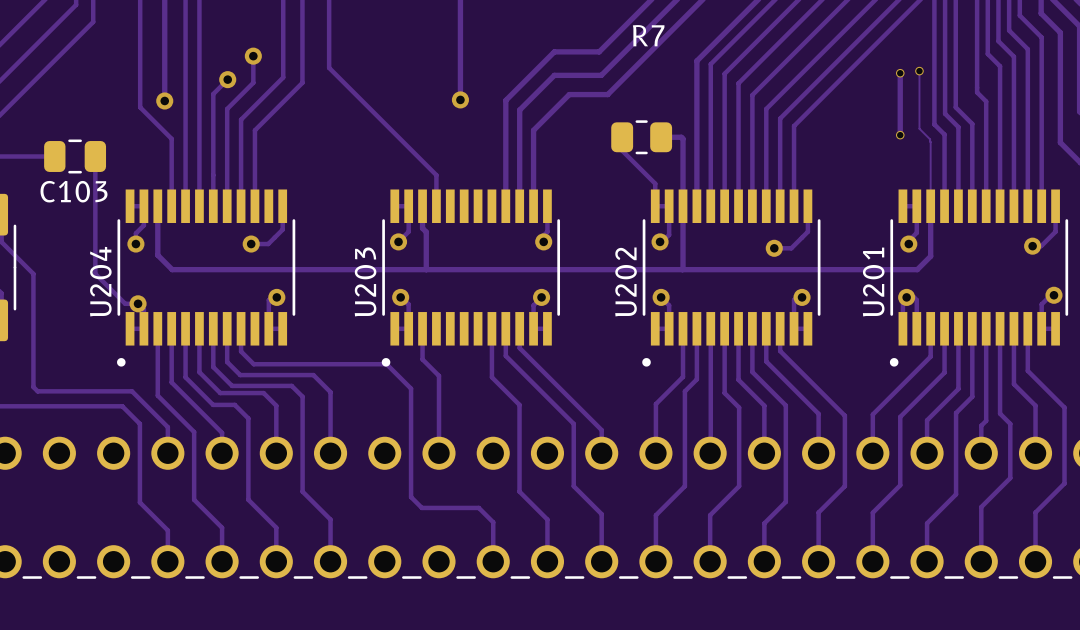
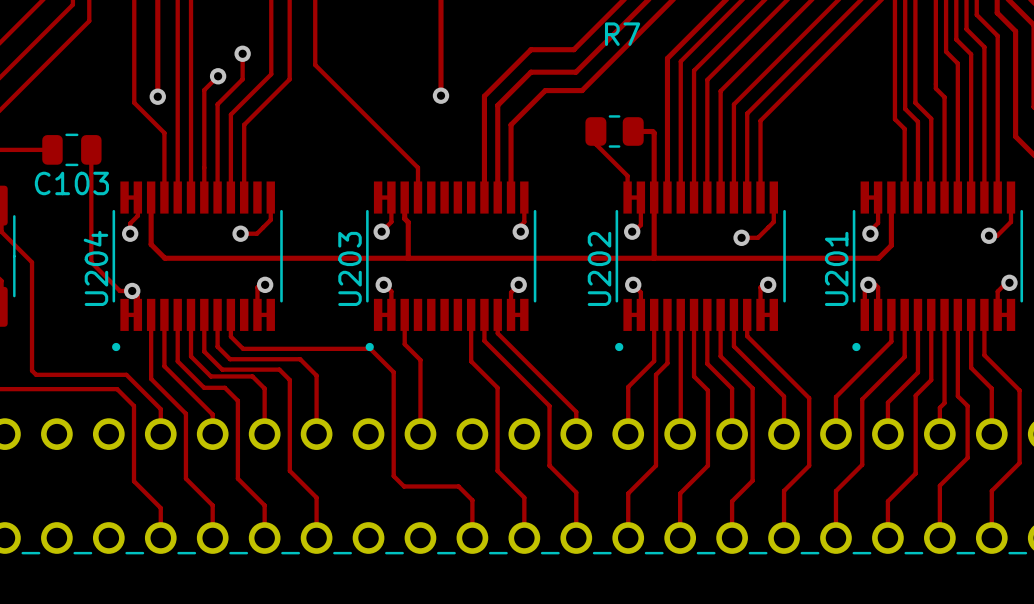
track: (919, 71) (919, 128) (930, 142) (930, 206) -> none
via: (919, 71) -> none
track: (900, 73) (900, 135) -> none
via: (900, 73) -> none
via: (900, 135) -> none

